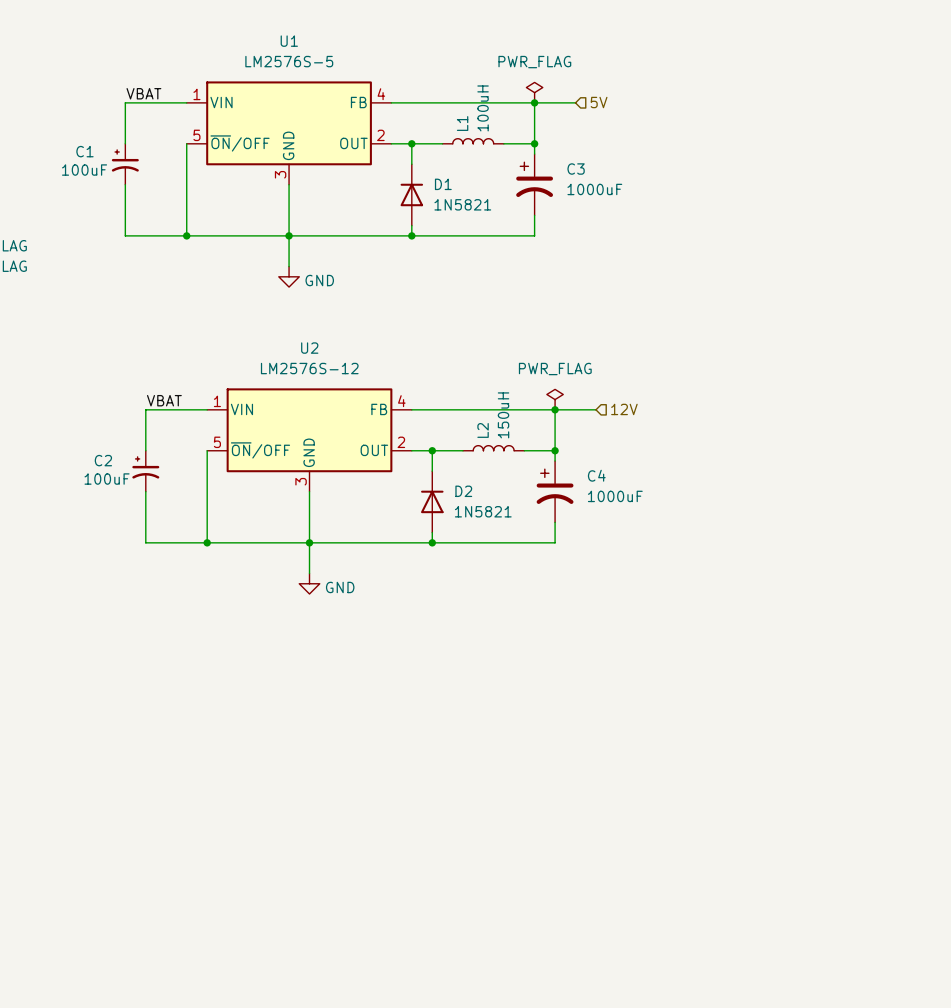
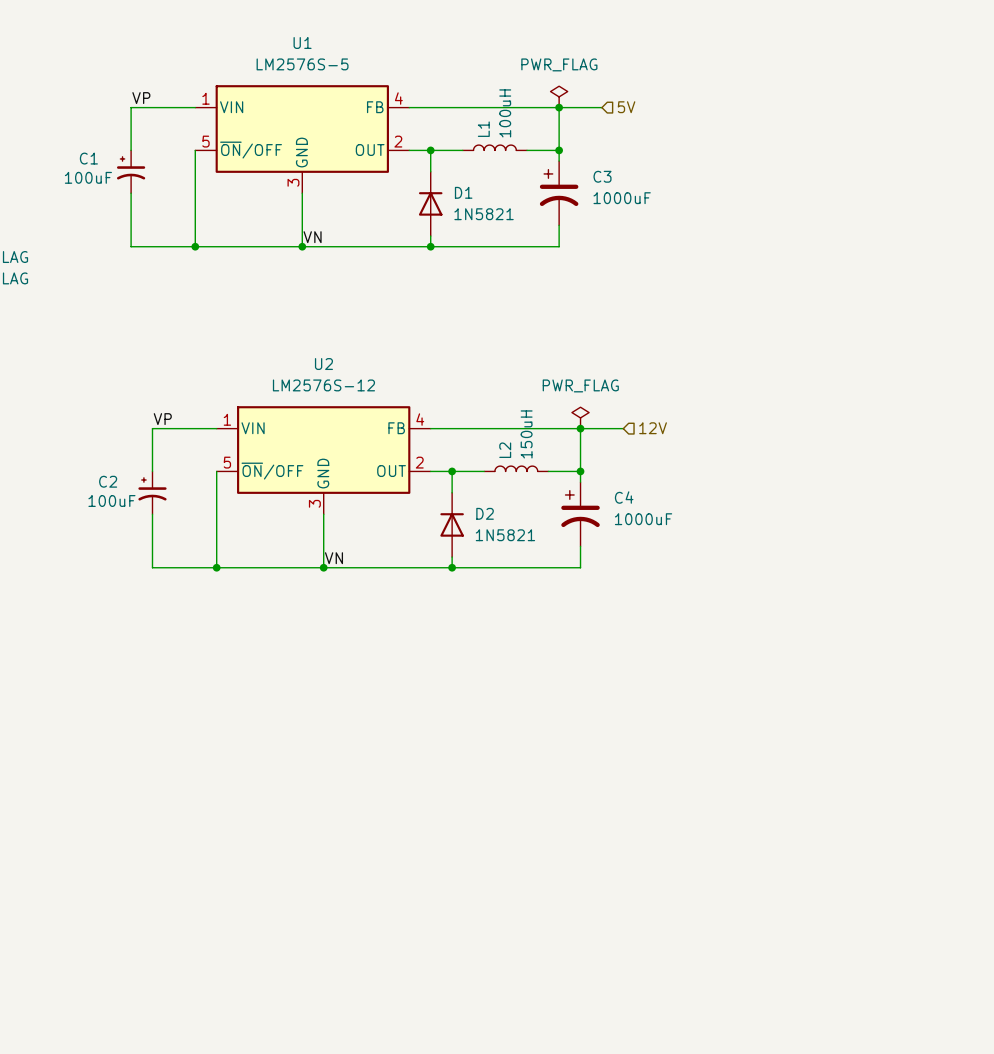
label: VBAT (143, 93) -> VP (141, 98)
label: none -> VN (312, 237)
wire: (289, 235) (289, 266) -> none
power symbol: GND (289, 276) -> none
label: VBAT (164, 400) -> VP (162, 419)
label: none -> VN (333, 558)
wire: (309, 542) (309, 573) -> none
power symbol: GND (309, 583) -> none

